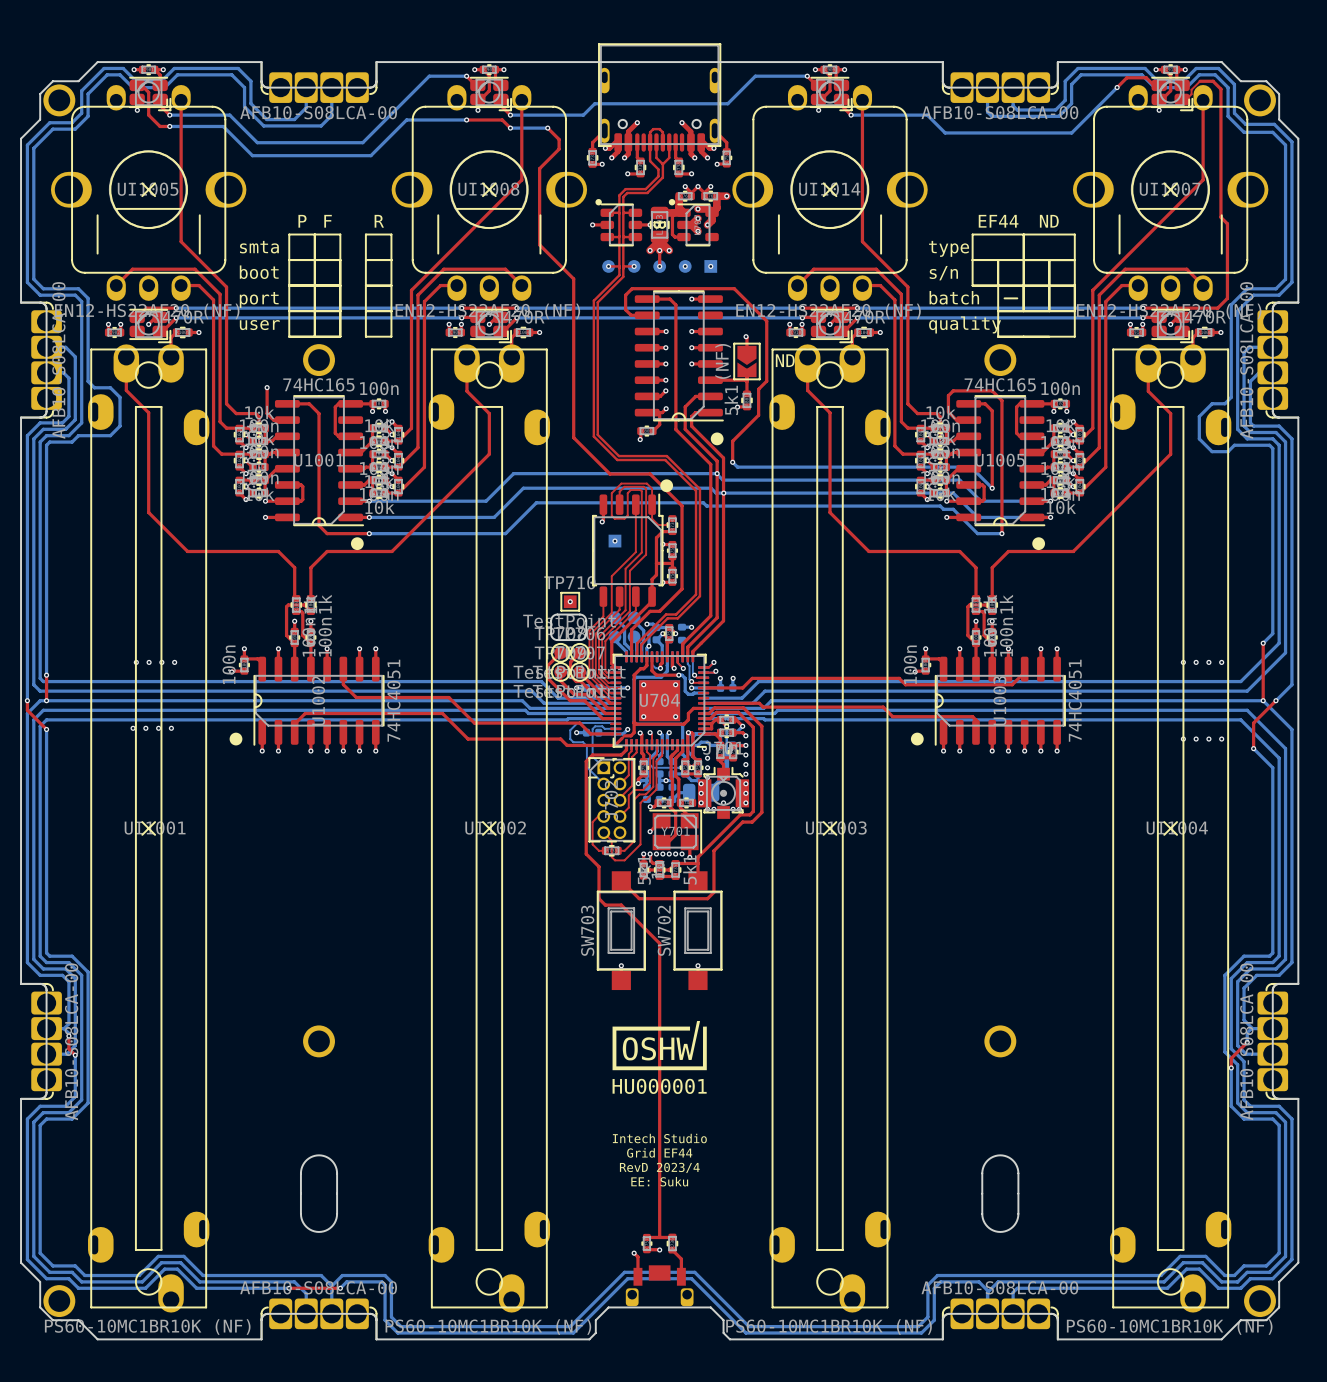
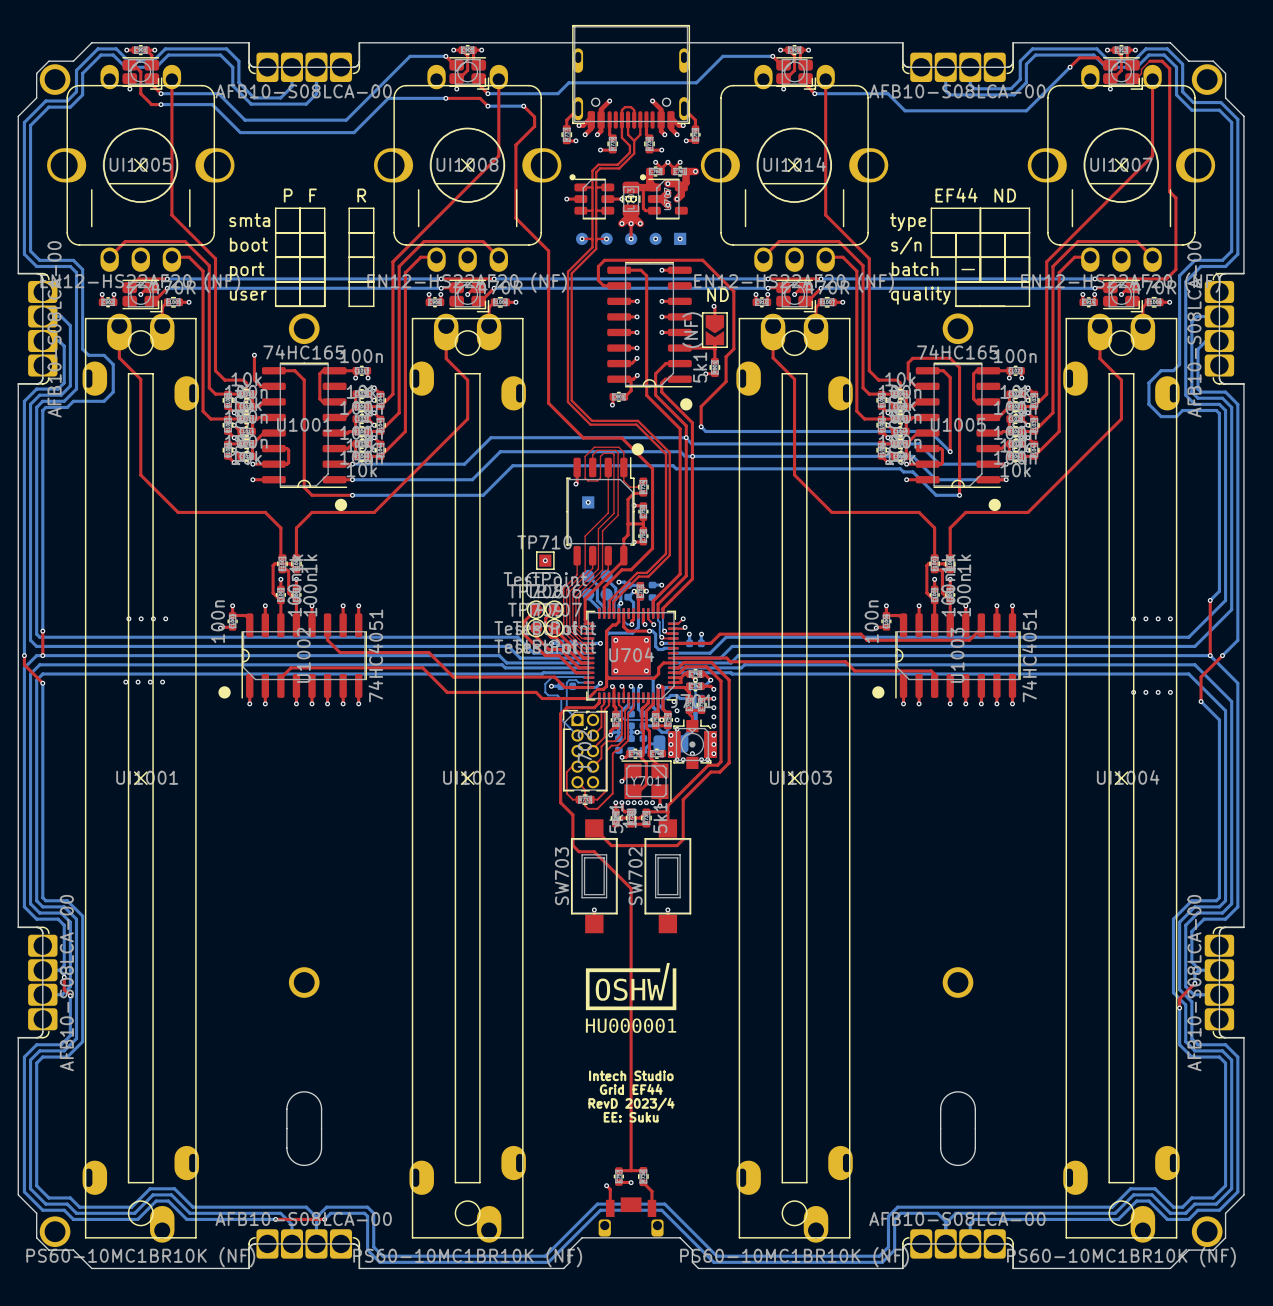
text position: ND (785, 360) -> ND (718, 294)

